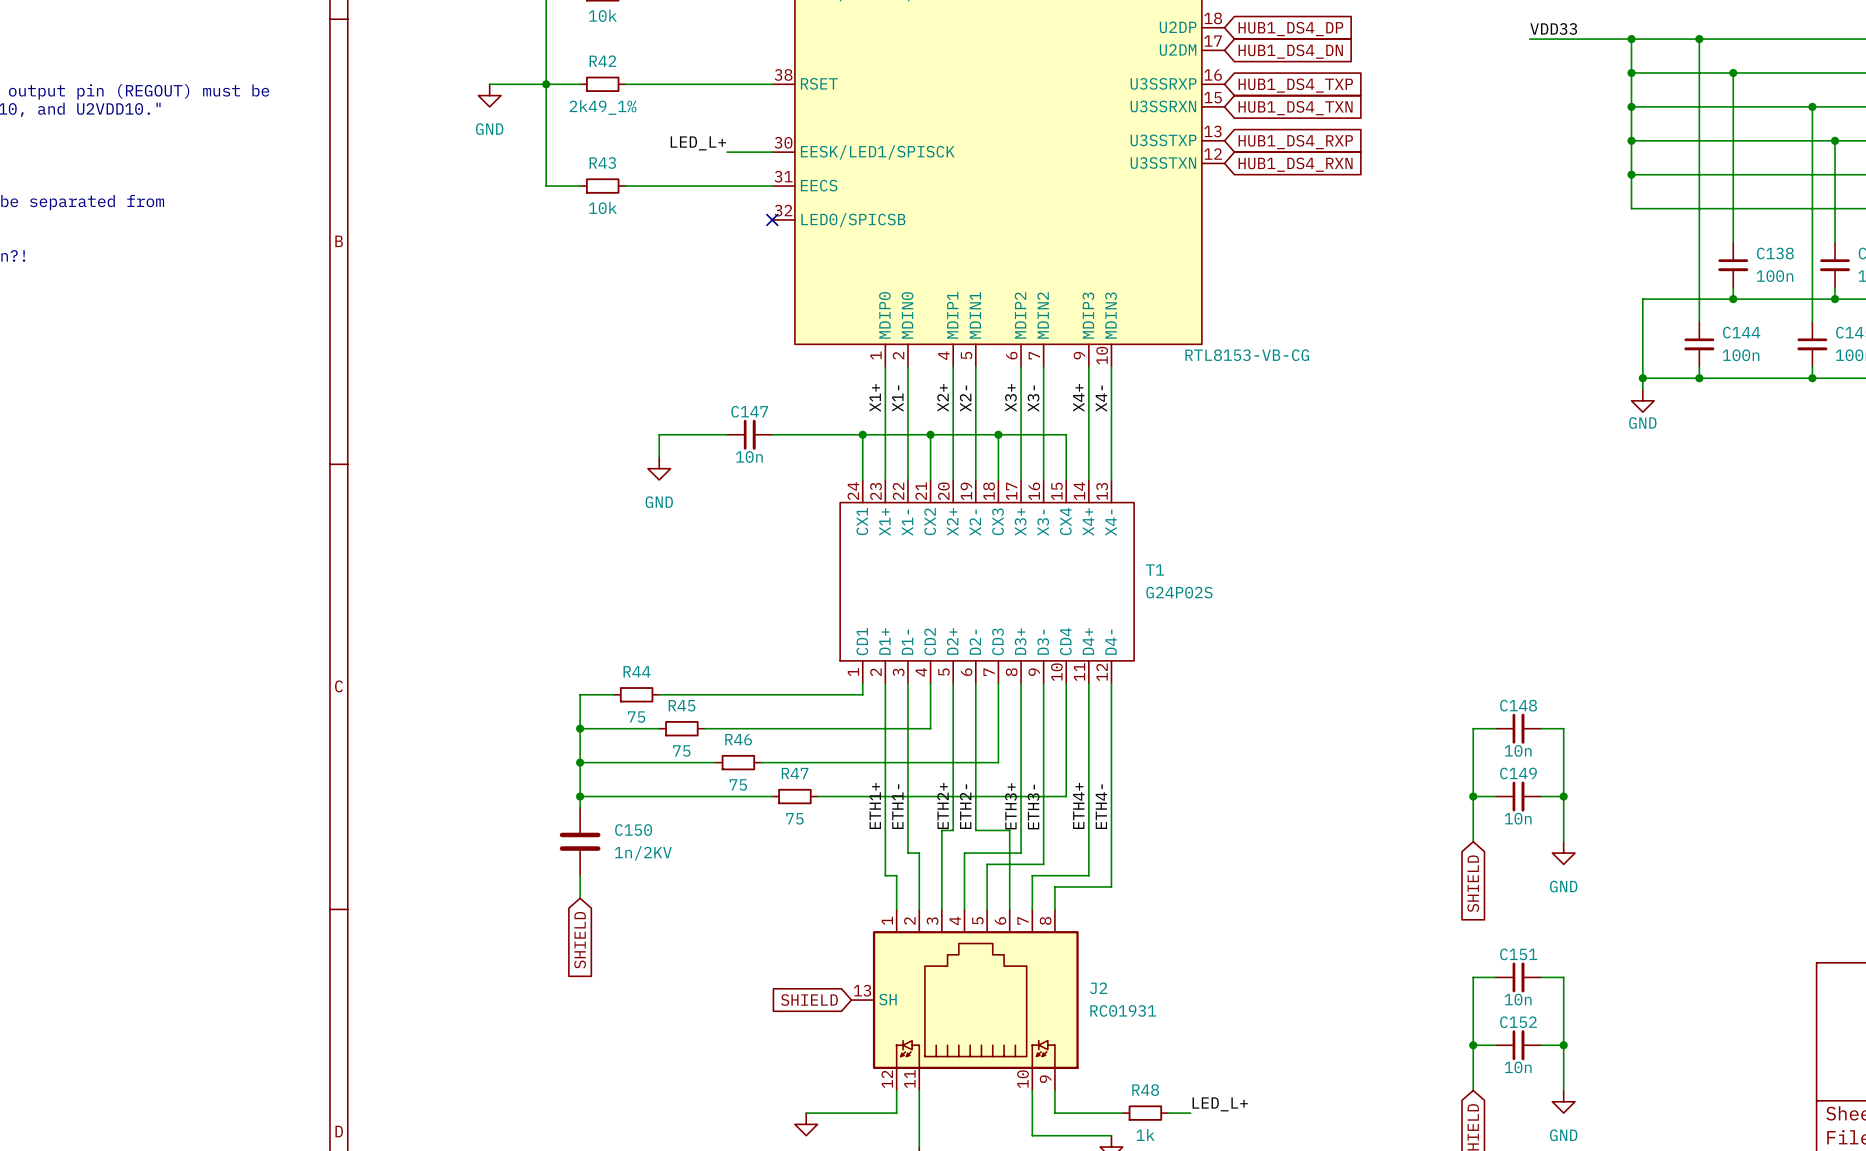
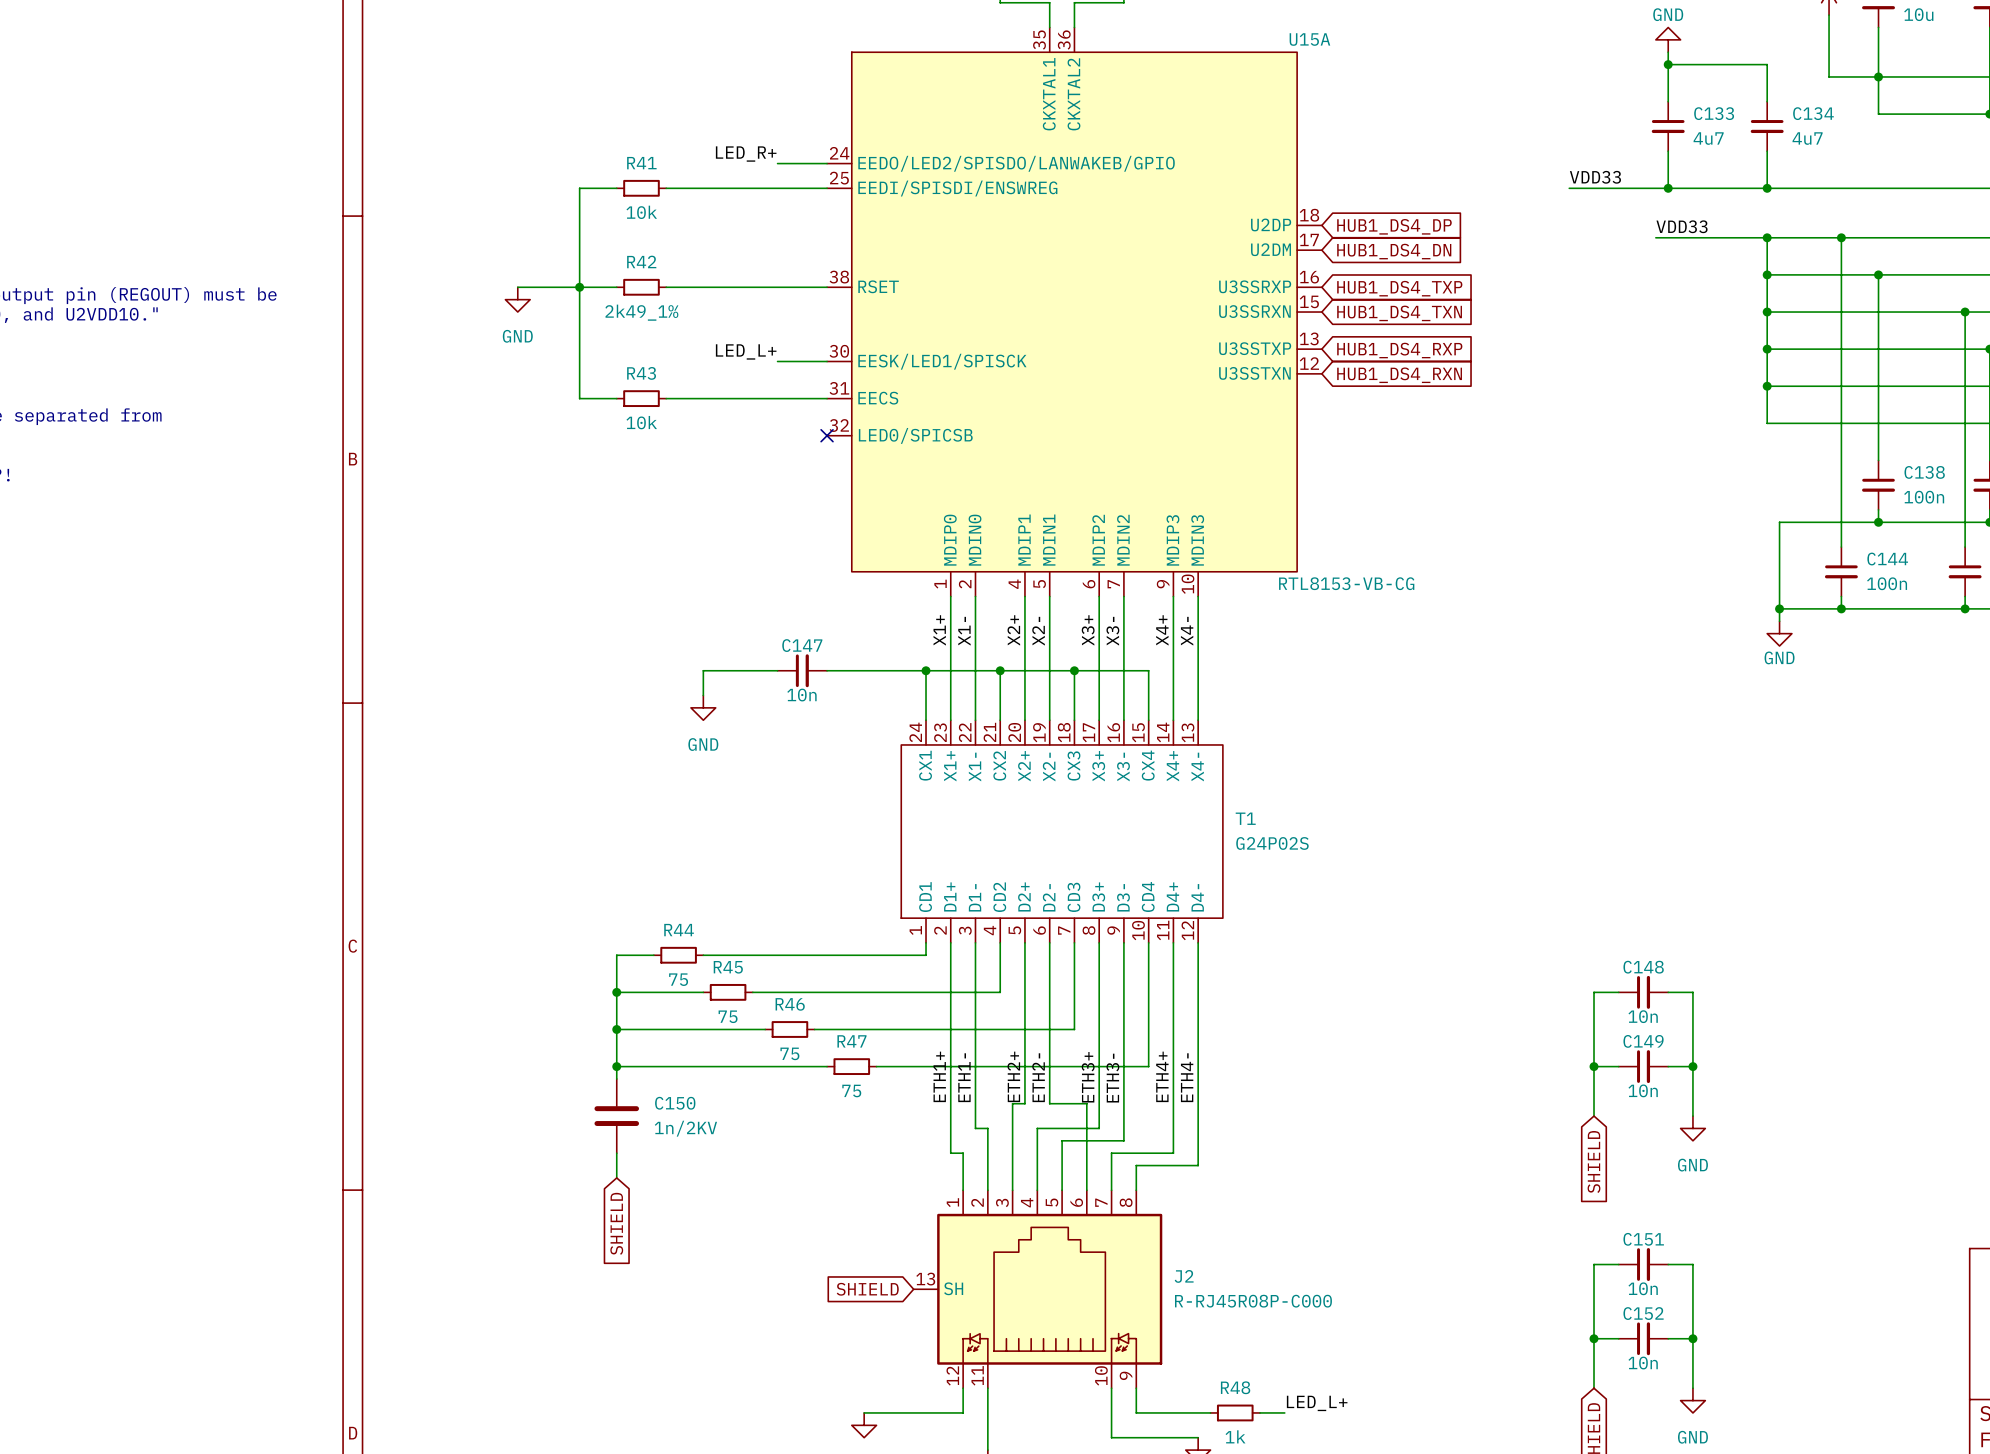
J2 value: RC01931 (1123, 1010) -> R-RJ45R08P-C000 (1253, 1301)

